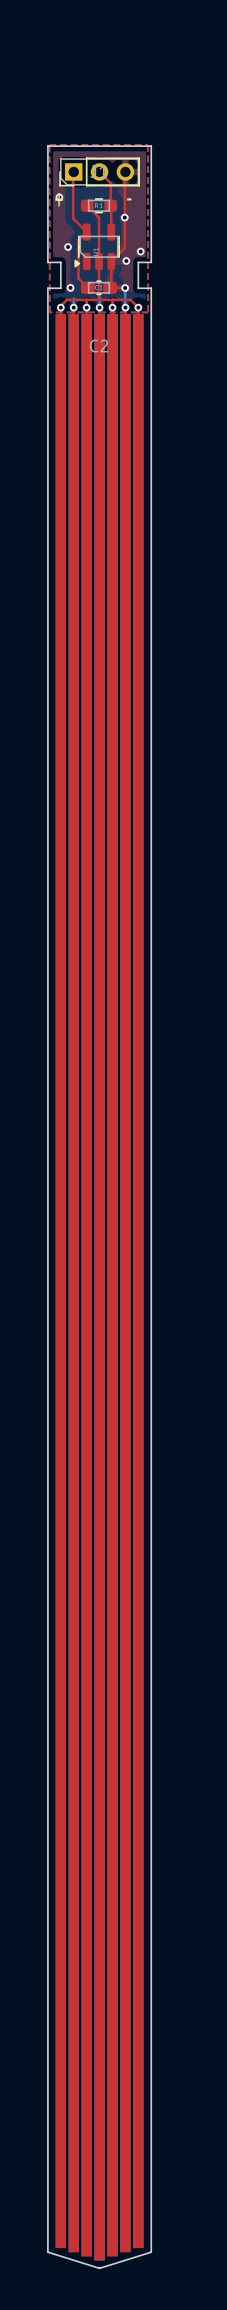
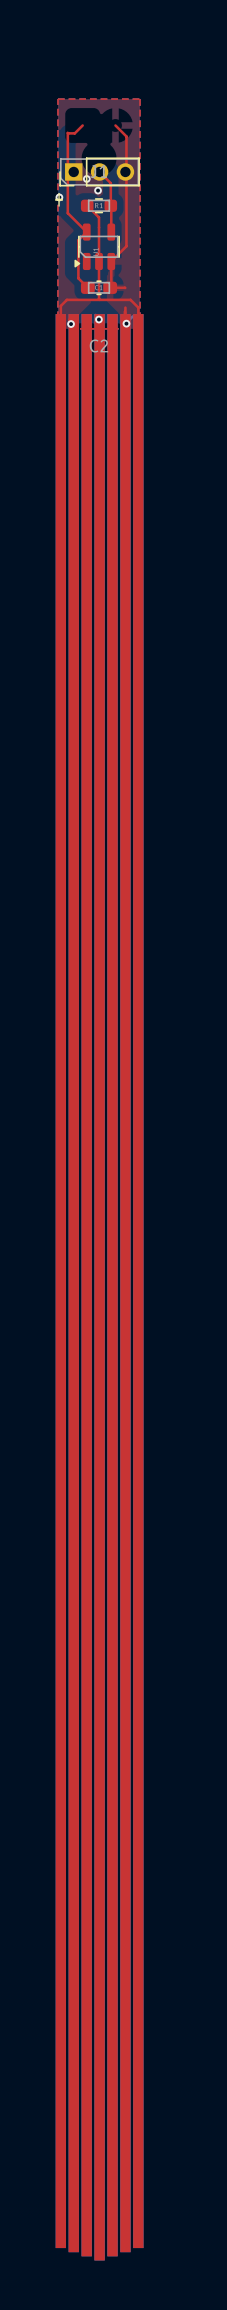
top zone outline: (49, 145) (147, 145) (148, 312) (49, 312) (49, 145) -> (57, 99) (57, 328) (140, 328) (140, 99) (57, 99)
board edge: (47, 146) (47, 262) (60, 262) (60, 288) (47, 288) (47, 2252) (99, 2268) (151, 2252) (151, 288) (138, 288) (138, 262) (151, 262) (151, 146) (47, 146) -> none
top track: (73, 171) (73, 218) -> (82, 125) (74, 133) (67, 132) (67, 213) (73, 218)
top track: (125, 171) (124, 247) -> (115, 125) (126, 136) (126, 246) (124, 247)
via: none -> (86, 178)
via: none -> (98, 190)
text: - (129, 199) -> none
via: (124, 217) -> none
via: (68, 247) -> none
via: (140, 251) -> none
via: (126, 260) -> none
via: (70, 287) -> none
via: (125, 288) -> none
via: (60, 307) -> none
via: (73, 307) -> none
via: (86, 307) -> none
via: (99, 307) -> none
via: (112, 307) -> none
via: (125, 307) -> none
via: (138, 307) -> none
via: none -> (98, 319)
via: none -> (126, 323)
via: none -> (71, 324)

